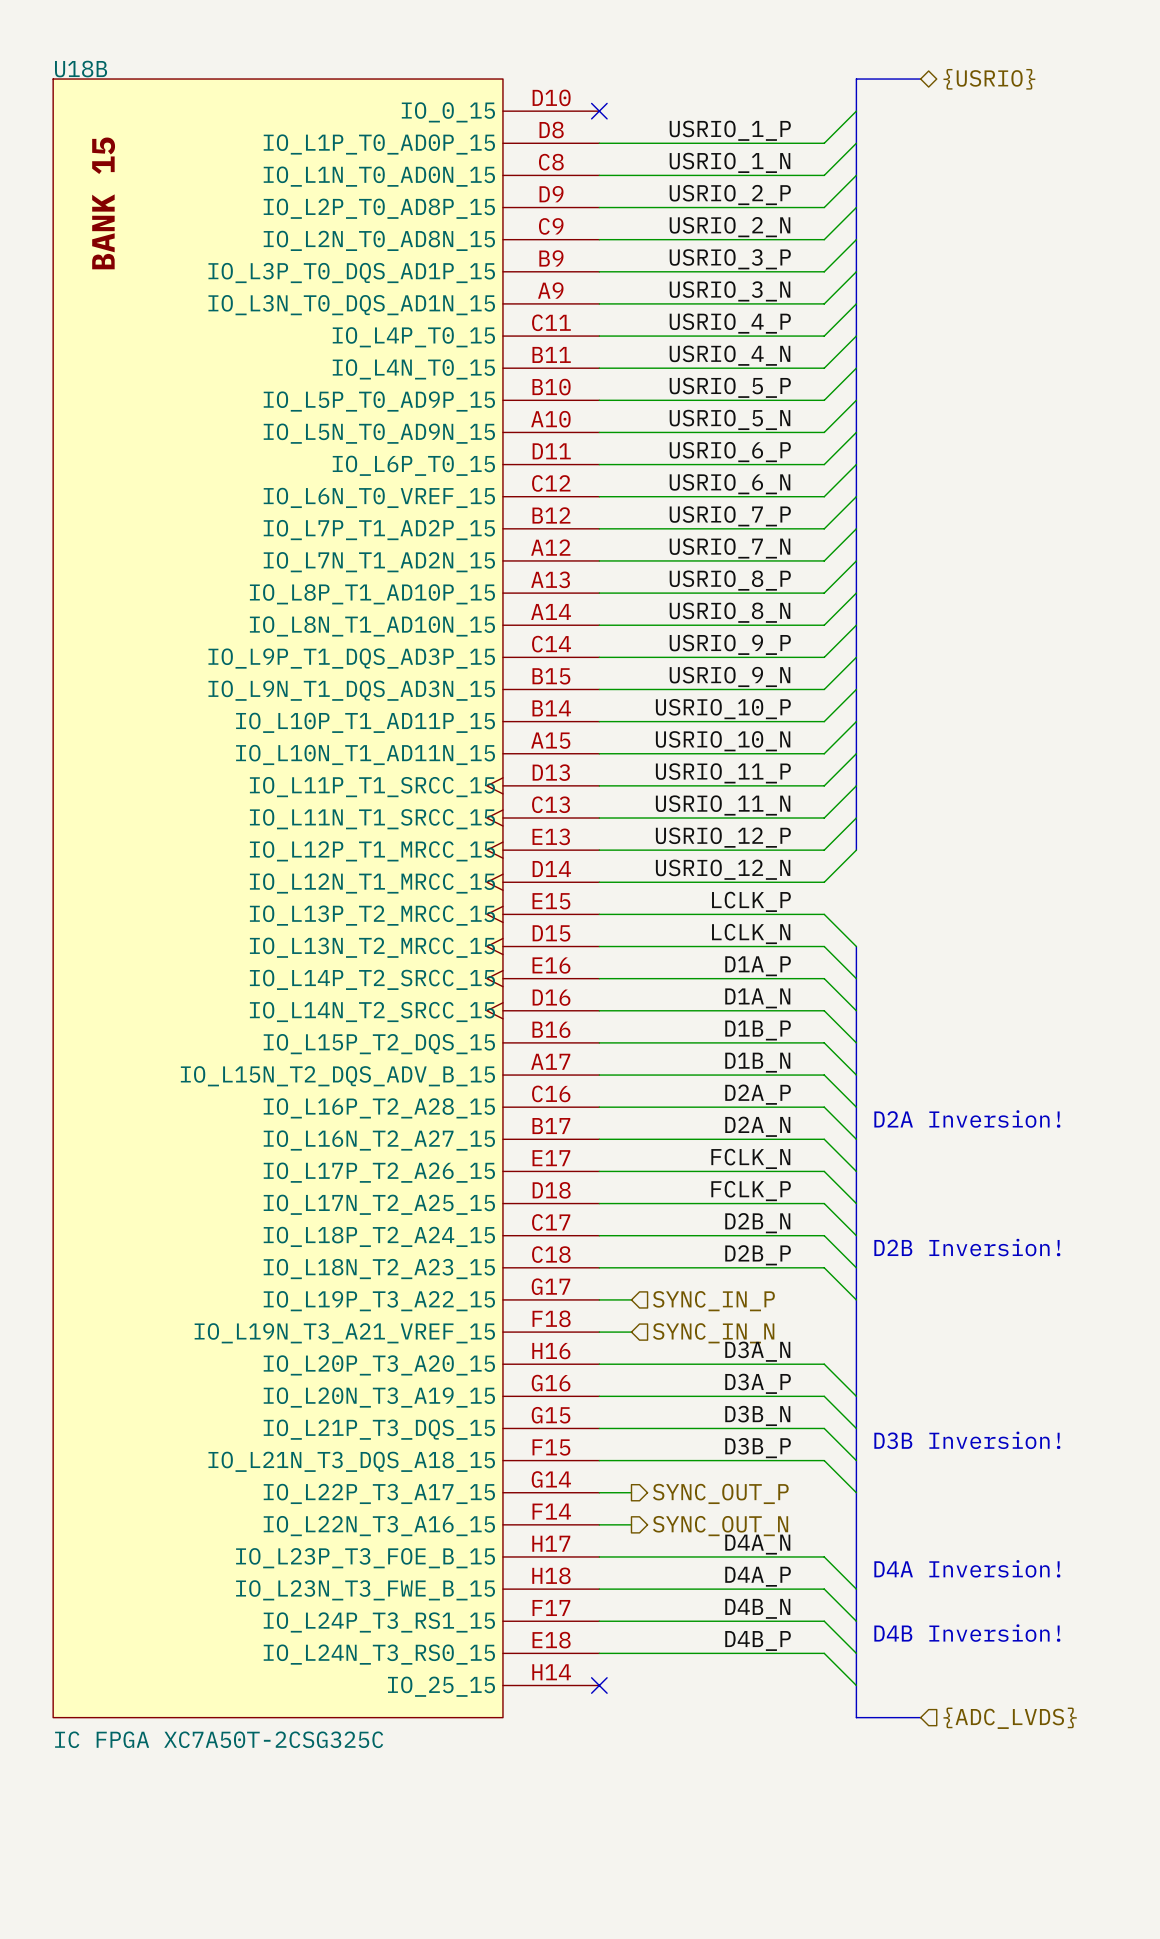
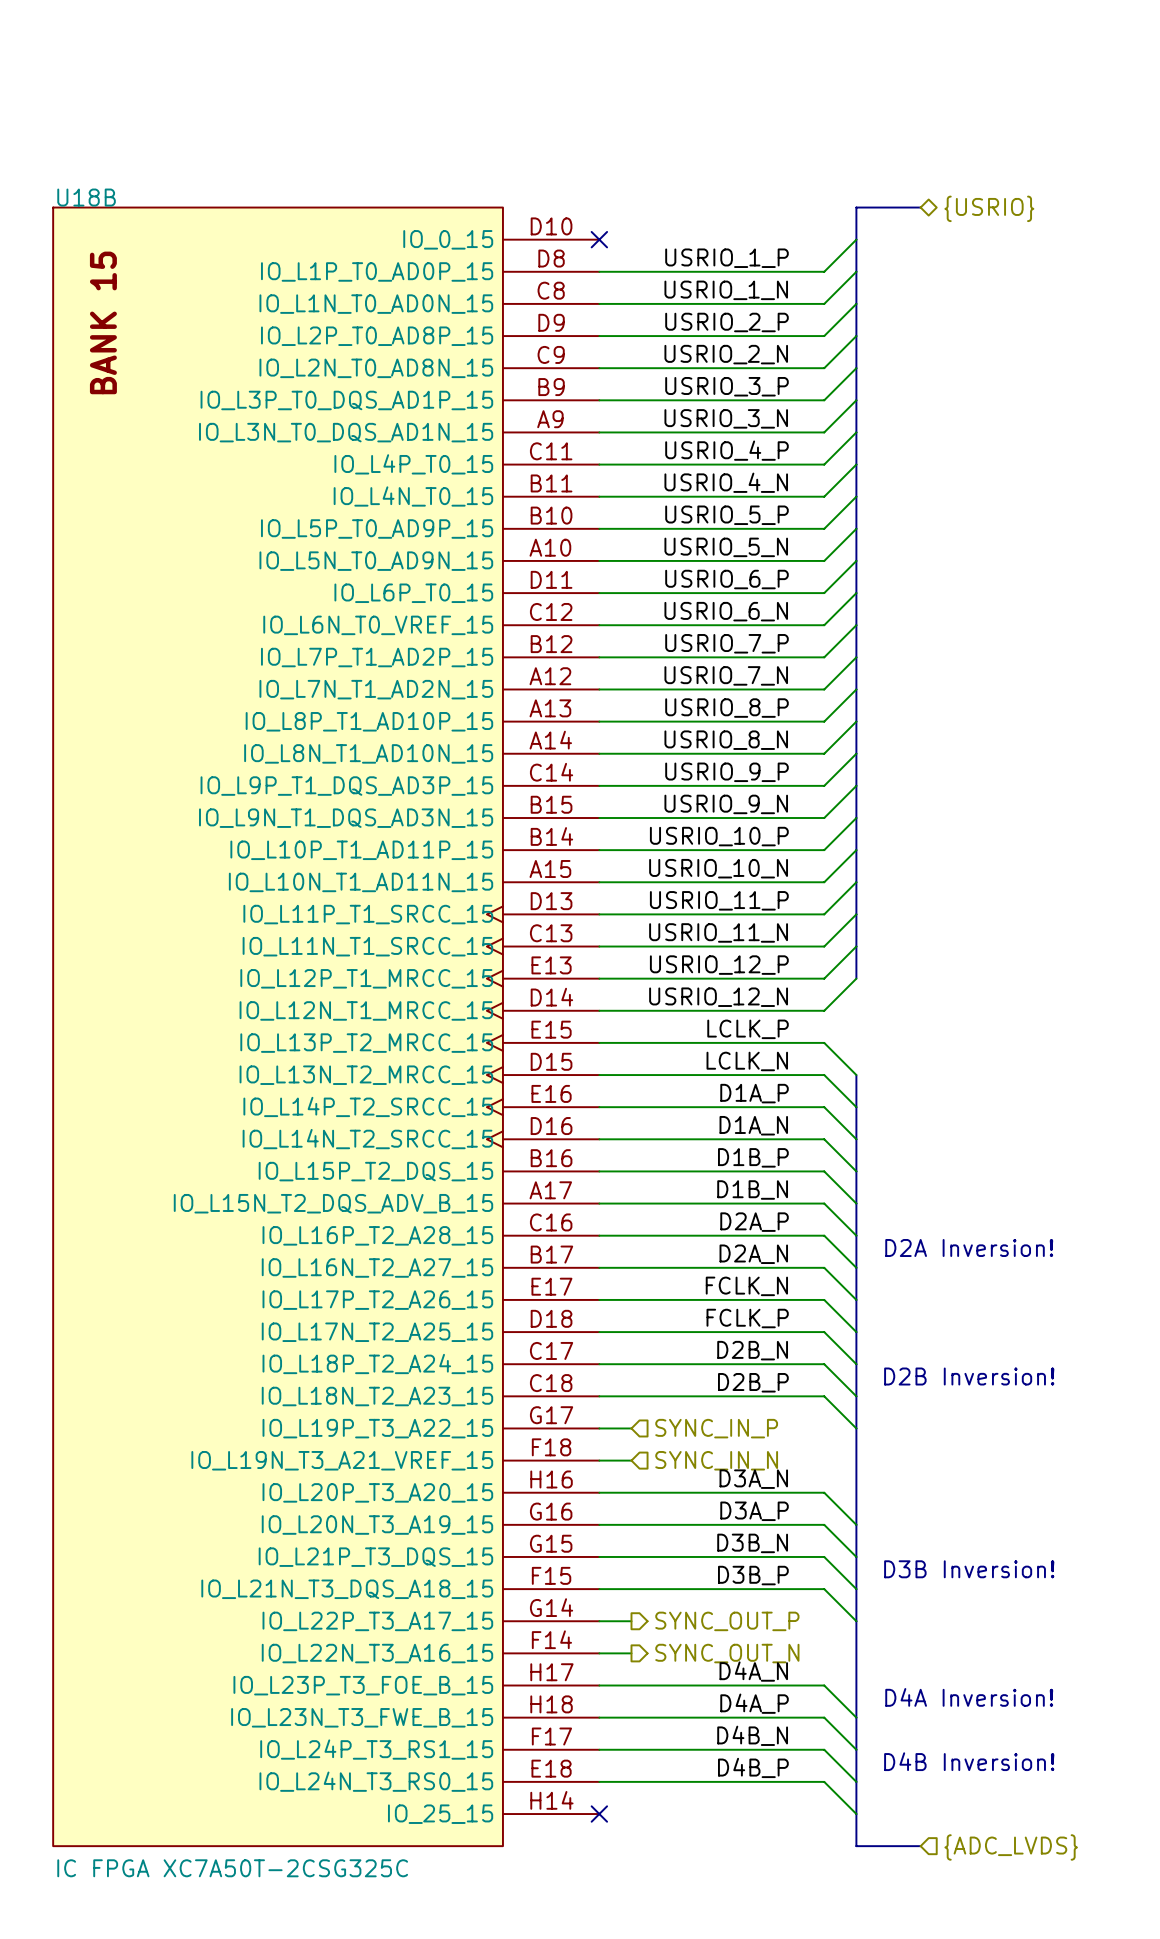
bus: (920, 79) (856, 79) (856, 207) -> (920, 207) (856, 207)
hierarchical label position: {USRIO} (989, 79) -> {USRIO} (989, 208)
no-connect mark: (599, 111) -> none
wire: (856, 111) (824, 143) (599, 143) -> none
label: USRIO_1_P (730, 130) -> none
wire: (856, 143) (824, 175) (599, 175) -> none
label: USRIO_1_N (729, 162) -> none
wire: (856, 175) (824, 207) (599, 207) -> none
label: USRIO_2_P (730, 195) -> none
wire: (856, 207) (824, 239) (599, 239) -> none
label: USRIO_2_N (729, 227) -> none
no-connect mark: none -> (599, 239)
label: USRIO_3_P (730, 259) -> USRIO_1_P (726, 258)
label: USRIO_3_N (729, 291) -> USRIO_1_N (726, 290)
label: USRIO_4_P (730, 323) -> USRIO_2_P (726, 322)
label: USRIO_4_N (729, 355) -> USRIO_2_N (726, 354)
label: USRIO_5_P (730, 387) -> USRIO_3_P (726, 386)
label: USRIO_5_N (729, 419) -> USRIO_3_N (726, 418)
label: USRIO_6_P (730, 452) -> USRIO_4_P (726, 450)
label: USRIO_6_N (729, 484) -> USRIO_4_N (726, 482)
label: USRIO_7_P (730, 516) -> USRIO_5_P (726, 515)
label: USRIO_7_N (729, 548) -> USRIO_5_N (726, 547)
label: USRIO_8_P (730, 580) -> USRIO_6_P (726, 579)
label: USRIO_8_N (729, 612) -> USRIO_6_N (726, 611)
label: USRIO_9_P (730, 644) -> USRIO_7_P (726, 643)
label: USRIO_9_N (729, 676) -> USRIO_7_N (726, 675)
label: USRIO_10_P (723, 709) -> USRIO_8_P (726, 708)
label: USRIO_10_N (723, 741) -> USRIO_8_N (726, 740)
label: USRIO_11_P (723, 773) -> USRIO_9_P (726, 772)
label: USRIO_11_N (723, 805) -> USRIO_9_N (726, 804)
label: USRIO_12_P (723, 837) -> USRIO_10_P (719, 836)
label: USRIO_12_N (723, 869) -> USRIO_10_N (718, 868)
U18B position: (326, 898) -> (326, 1026)
label: LCLK_P (751, 901) -> USRIO_11_P (719, 900)
wire: (824, 914) (856, 946) -> (824, 914) (856, 882)
label: LCLK_N (751, 933) -> USRIO_11_N (718, 932)
wire: (824, 946) (856, 978) -> (824, 946) (856, 914)
label: D1A_P (758, 966) -> USRIO_12_P (719, 965)
wire: (824, 978) (856, 1010) -> (824, 978) (856, 946)
bus: (856, 978) (856, 1075) -> (856, 850) (856, 946)
label: D1A_N (757, 998) -> USRIO_12_N (718, 997)
wire: (824, 1010) (856, 1042) -> (824, 1010) (856, 978)
label: D1B_P (758, 1030) -> LCLK_P (748, 1029)
label: D1B_N (757, 1062) -> LCLK_N (747, 1061)
label: D2A_P (758, 1094) -> D1A_P (754, 1093)
text: D2A Inversion! (967, 1119) -> none
label: D2A_N (757, 1126) -> D1A_N (753, 1125)
label: FCLK_N (750, 1158) -> D1B_P (753, 1157)
label: FCLK_P (751, 1191) -> D1B_N (752, 1189)
label: D2B_N (757, 1223) -> D2A_P (754, 1222)
text: D2B Inversion! (967, 1247) -> D2A Inversion! (969, 1247)
label: D2B_P (758, 1255) -> D2A_N (753, 1254)
label: none -> FCLK_N (746, 1286)
hierarchical label position: SYNC_IN_P (713, 1301) -> SYNC_IN_P (716, 1428)
label: none -> FCLK_P (747, 1318)
hierarchical label position: SYNC_IN_N (713, 1333) -> SYNC_IN_N (716, 1460)
label: D3A_N (757, 1351) -> D2B_N (752, 1350)
text: none -> D2B Inversion! (969, 1376)
label: D3A_P (758, 1383) -> D2B_P (753, 1382)
label: D3B_N (757, 1415) -> none
wire: (631, 1428) (824, 1428) (856, 1460) -> (631, 1299) (824, 1299) (856, 1332)
text: D3B Inversion! (967, 1440) -> none
label: D3B_P (758, 1448) -> none
wire: (631, 1460) (824, 1460) (856, 1492) -> (631, 1332) (824, 1332) (856, 1364)
label: none -> D3A_N (753, 1479)
hierarchical label position: SYNC_OUT_P (720, 1493) -> SYNC_OUT_P (727, 1621)
label: none -> D3A_P (754, 1511)
hierarchical label position: SYNC_OUT_N (720, 1526) -> SYNC_OUT_N (727, 1653)
label: D4A_N (757, 1544) -> D3B_N (752, 1543)
text: D4A Inversion! (967, 1568) -> D3B Inversion! (969, 1569)
label: D4A_P (758, 1576) -> D3B_P (753, 1575)
label position: D4B_N (757, 1608) -> D4B_N (752, 1735)
wire: (631, 1621) (824, 1621) (856, 1653) -> (631, 1492) (824, 1492) (856, 1524)
text position: D4B Inversion! (967, 1633) -> D4B Inversion! (969, 1761)
label position: D4B_P (758, 1640) -> D4B_P (753, 1767)
wire: (631, 1653) (824, 1653) (856, 1685) -> (631, 1524) (824, 1524) (856, 1556)
label: none -> D4A_N (753, 1671)
wire: none -> (599, 1685) (824, 1685) (856, 1717)
no-connect mark: (599, 1685) -> none
text: none -> D4A Inversion! (969, 1697)
label: none -> D4A_P (754, 1703)
wire: none -> (599, 1717) (824, 1717) (856, 1749)
bus: (856, 1717) (920, 1717) -> (856, 1717) (856, 1846) (920, 1846)
hierarchical label position: {ADC_LVDS} (1010, 1718) -> {ADC_LVDS} (1011, 1847)
wire: none -> (599, 1749) (824, 1749) (856, 1781)
wire: none -> (599, 1781) (824, 1781) (856, 1814)
no-connect mark: none -> (599, 1814)

